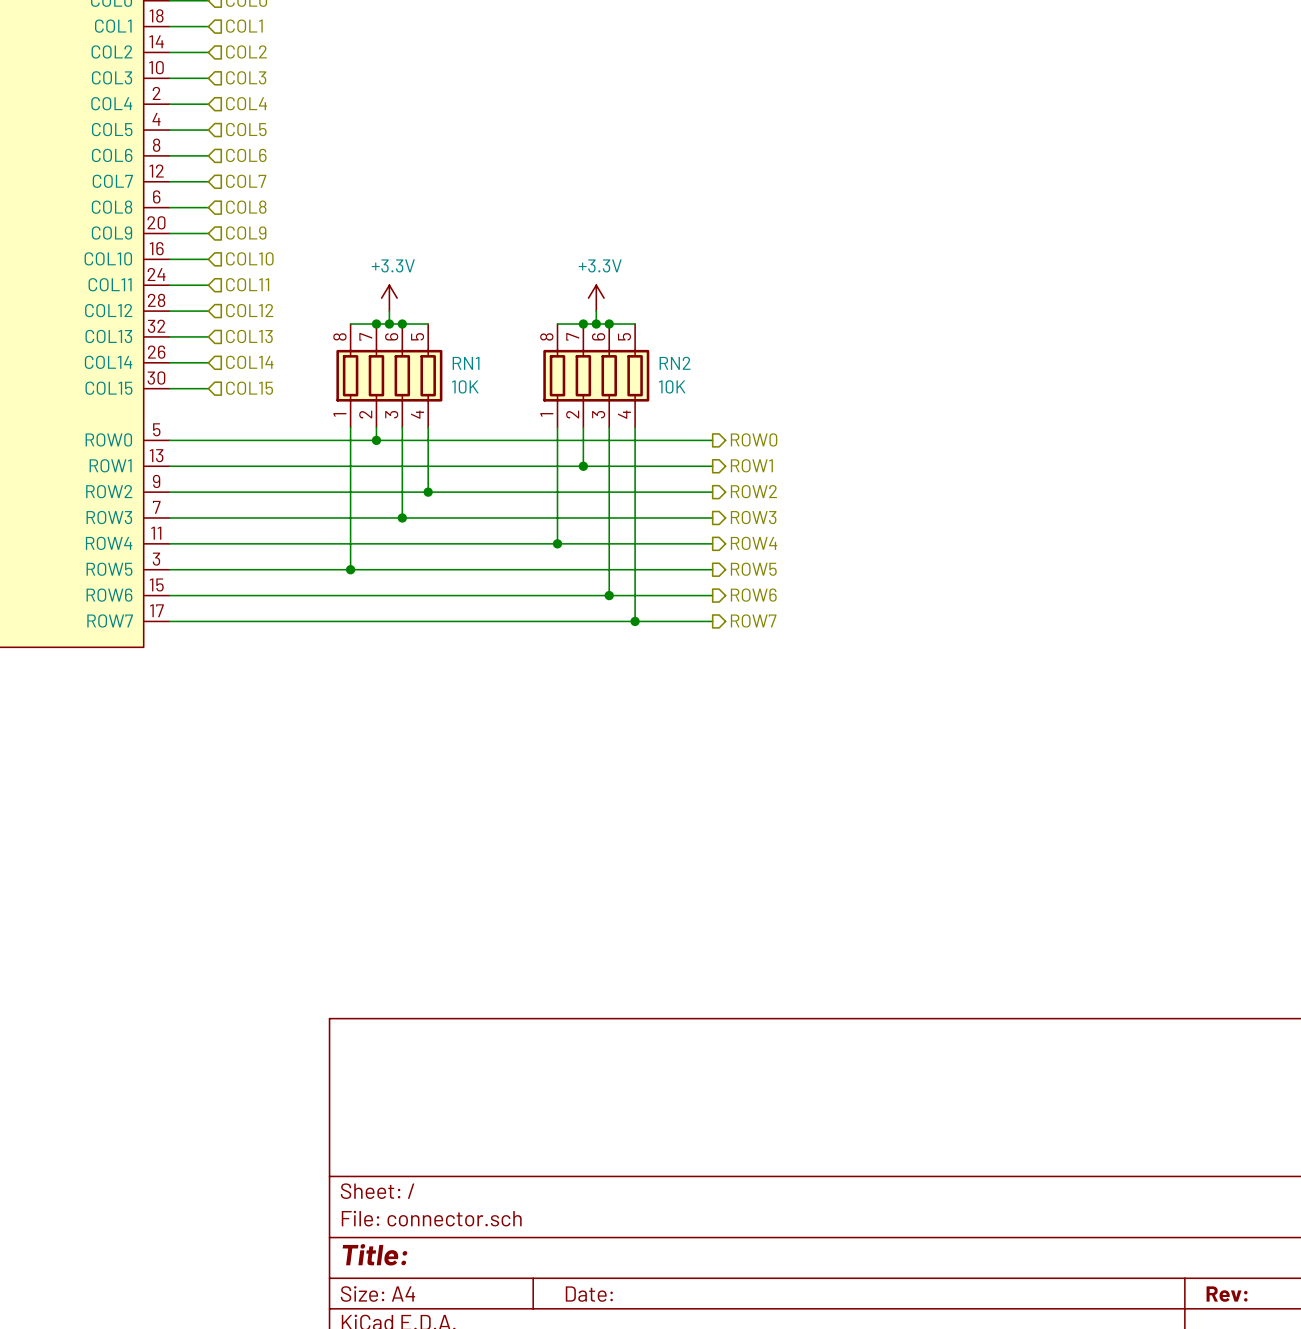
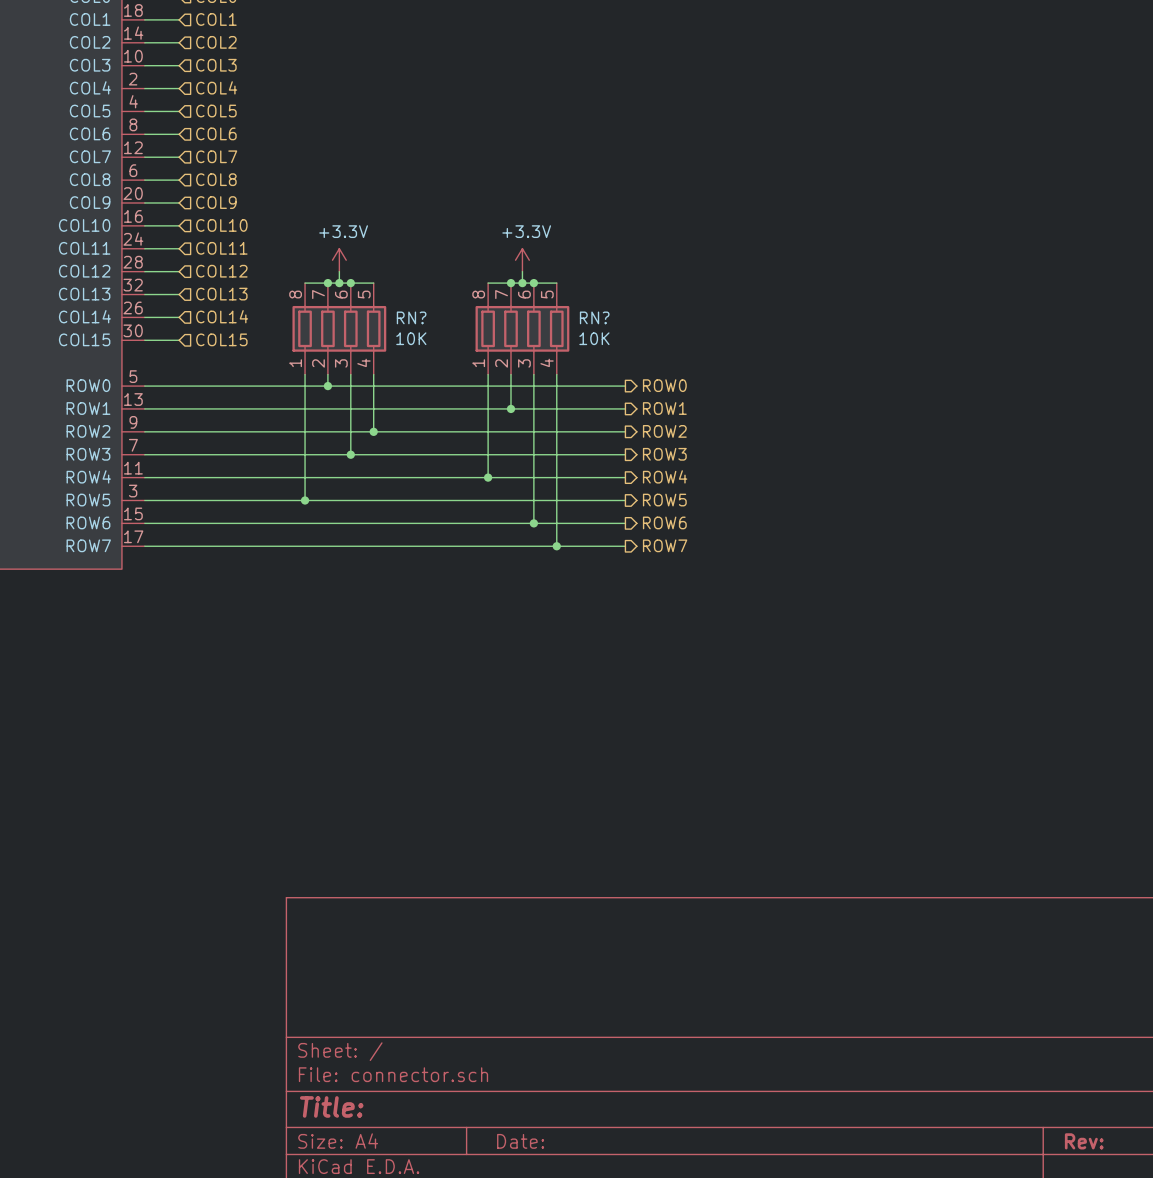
RN1 name: RN1 (466, 363) -> RN? (411, 317)
RN2 name: RN2 (675, 363) -> RN? (594, 317)

